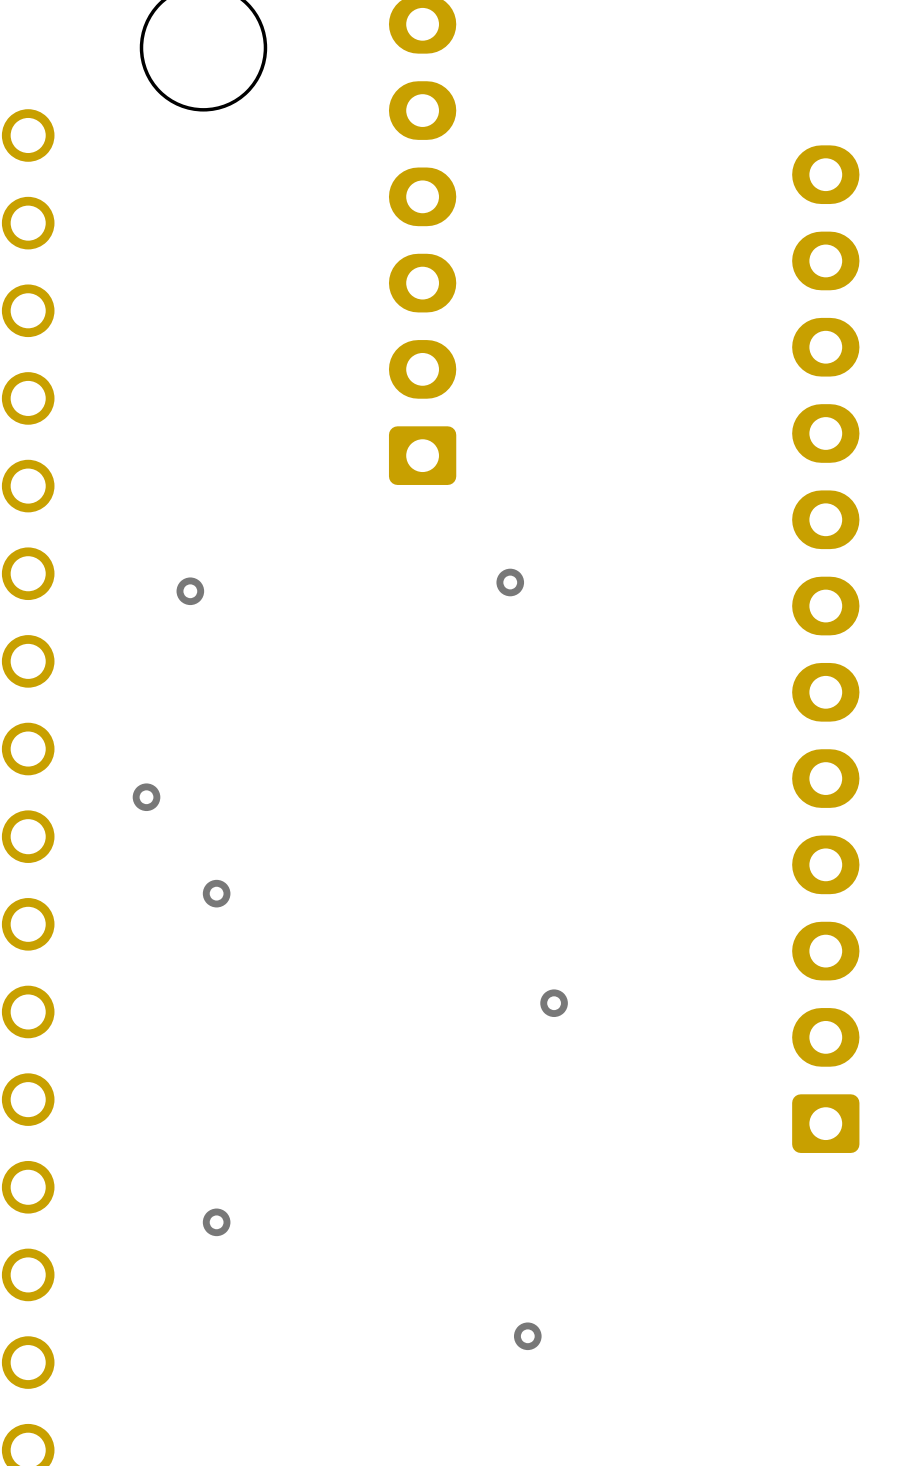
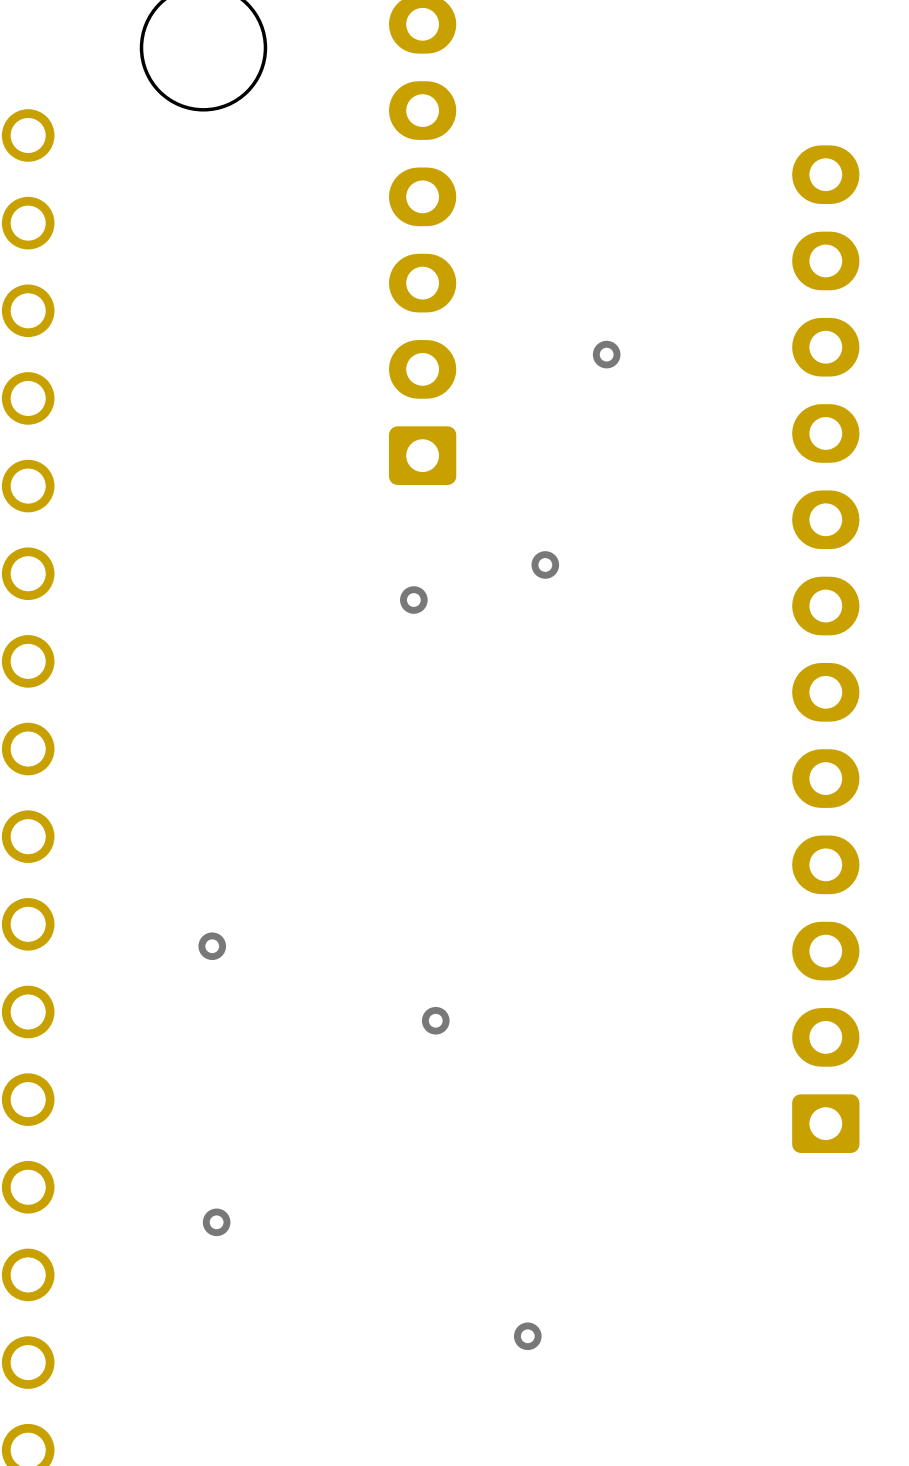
via: none -> (606, 354)
via position: (510, 582) -> (545, 564)
via: (190, 591) -> none
via: none -> (413, 600)
via: (146, 797) -> none
via position: (216, 893) -> (212, 946)
via position: (554, 1003) -> (435, 1020)

